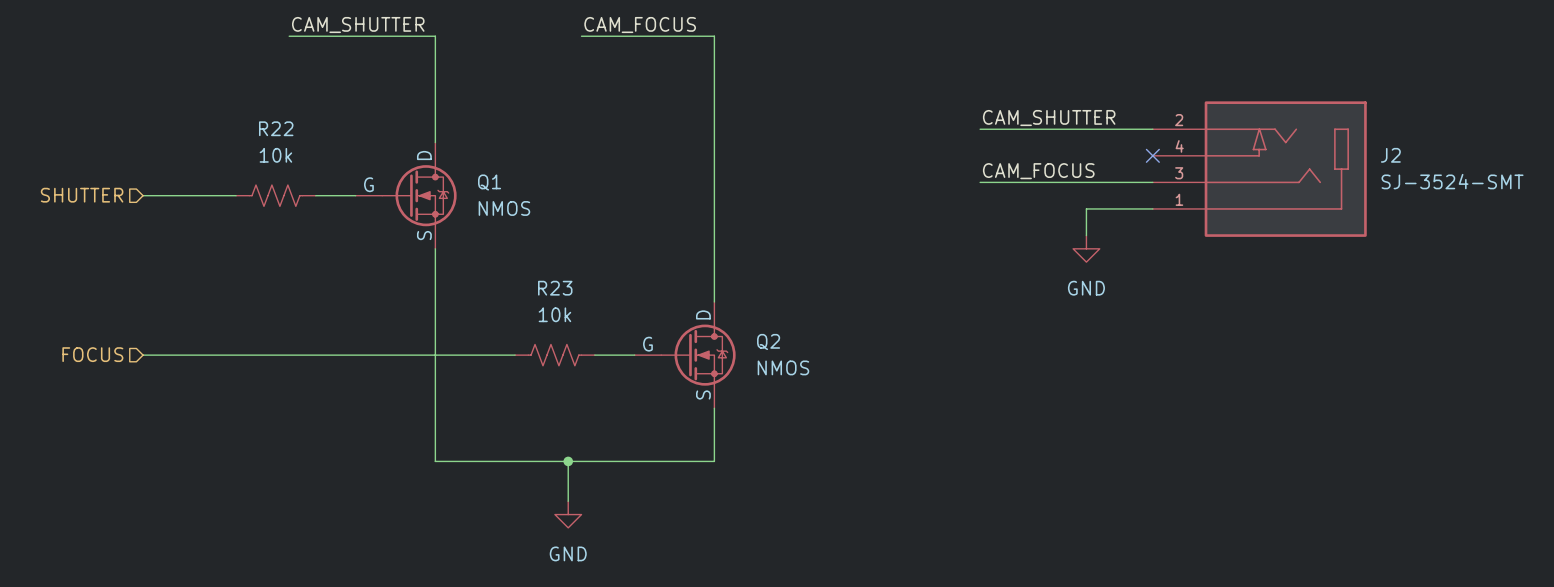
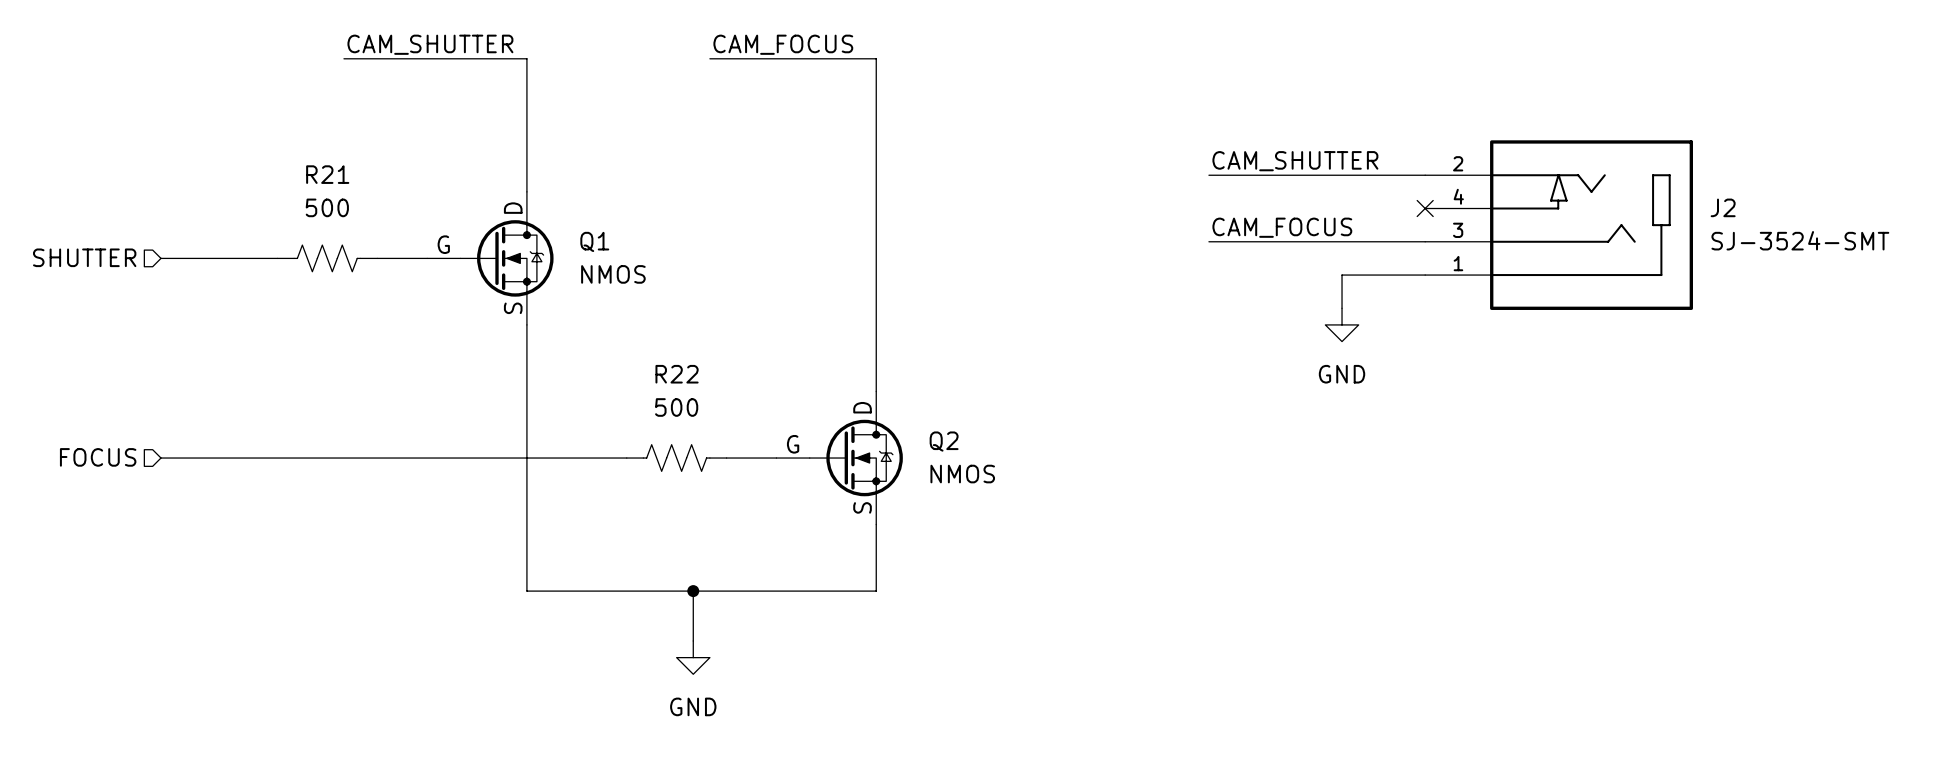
R22 name: R22 (276, 128) -> R21 (327, 174)
R22 value: 10k (275, 155) -> 500 (327, 207)
R23 name: R23 (555, 288) -> R22 (677, 374)
R23 value: 10k (554, 314) -> 500 (676, 407)

